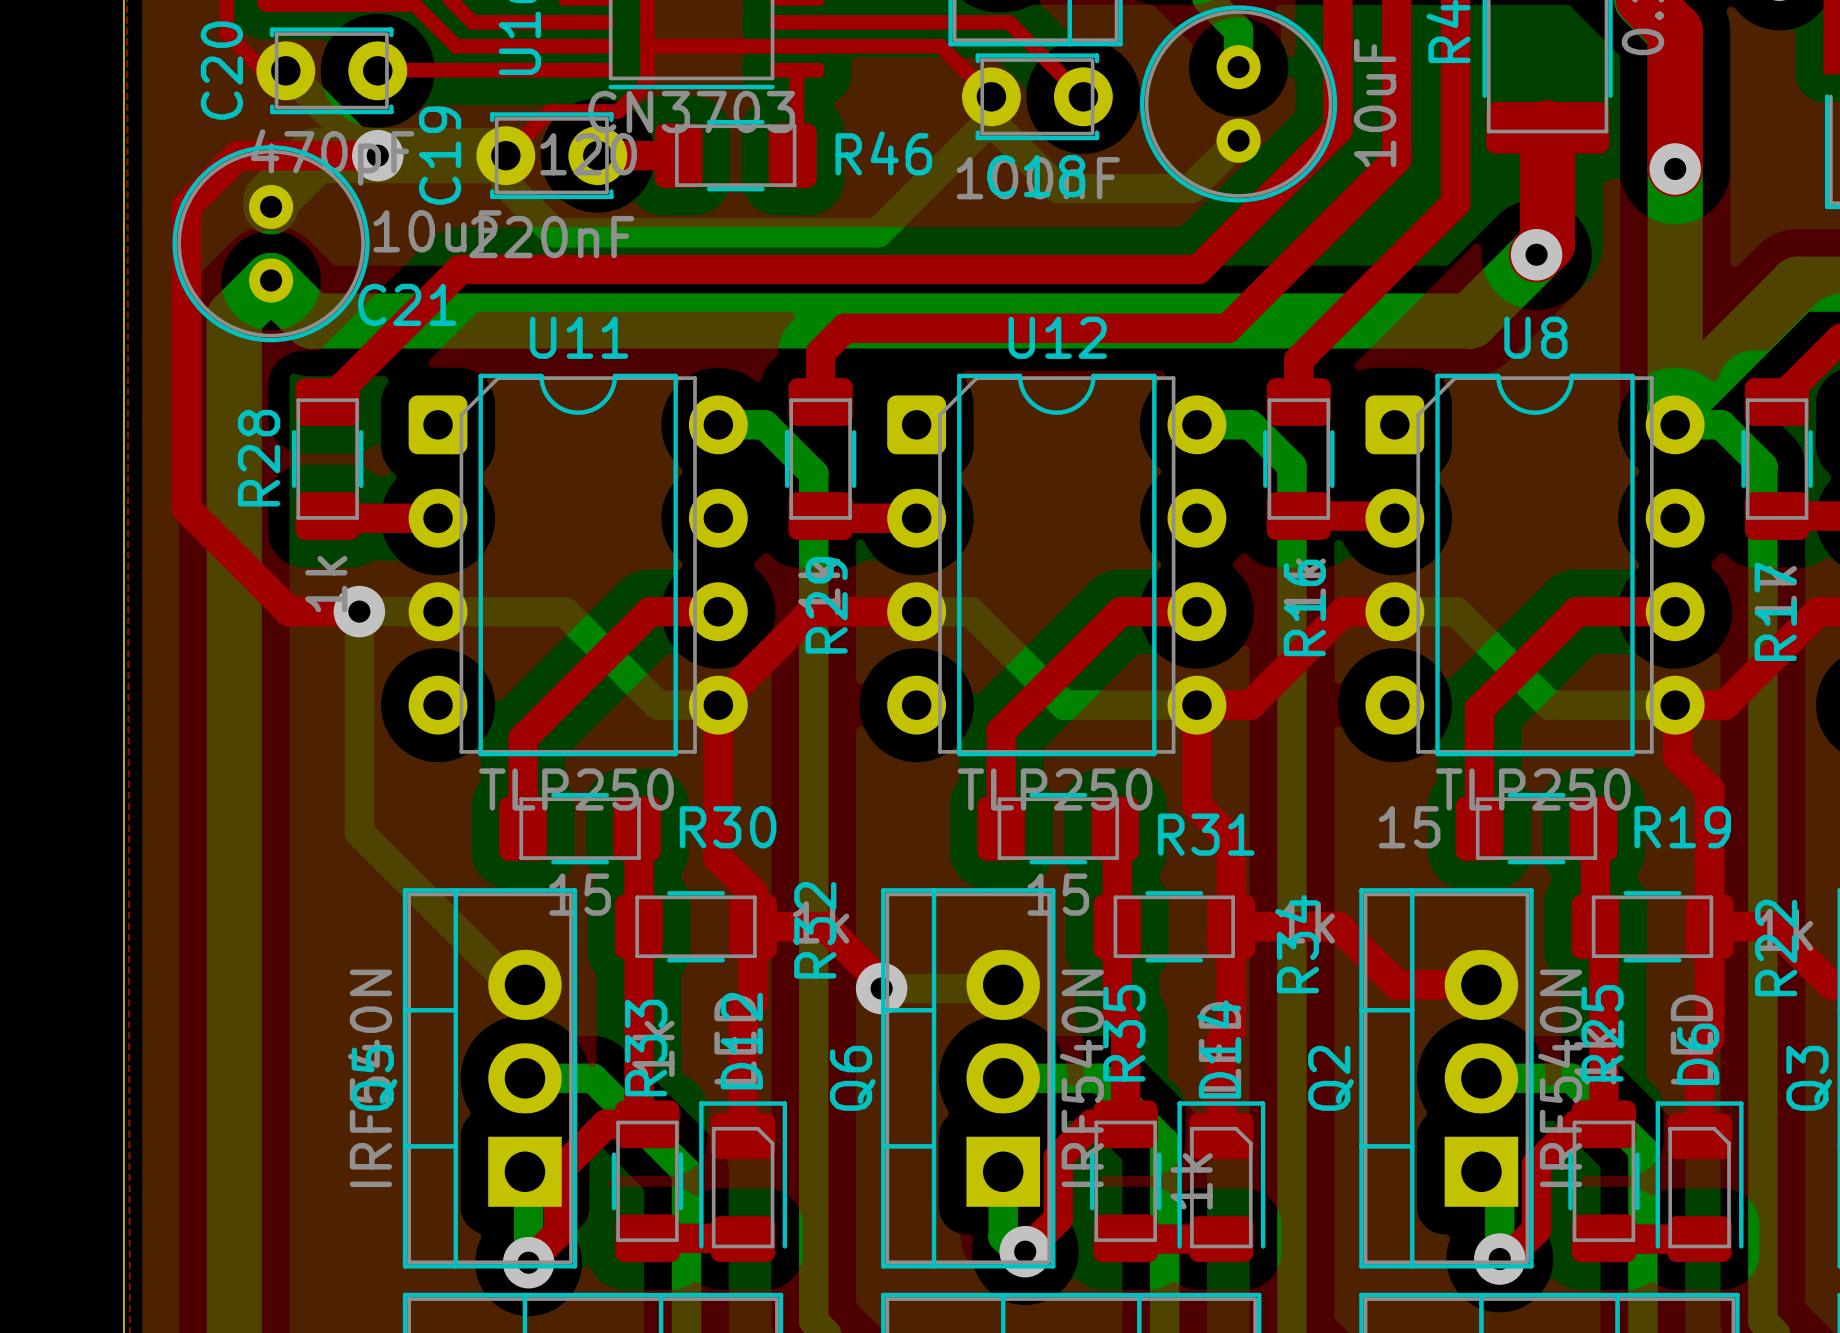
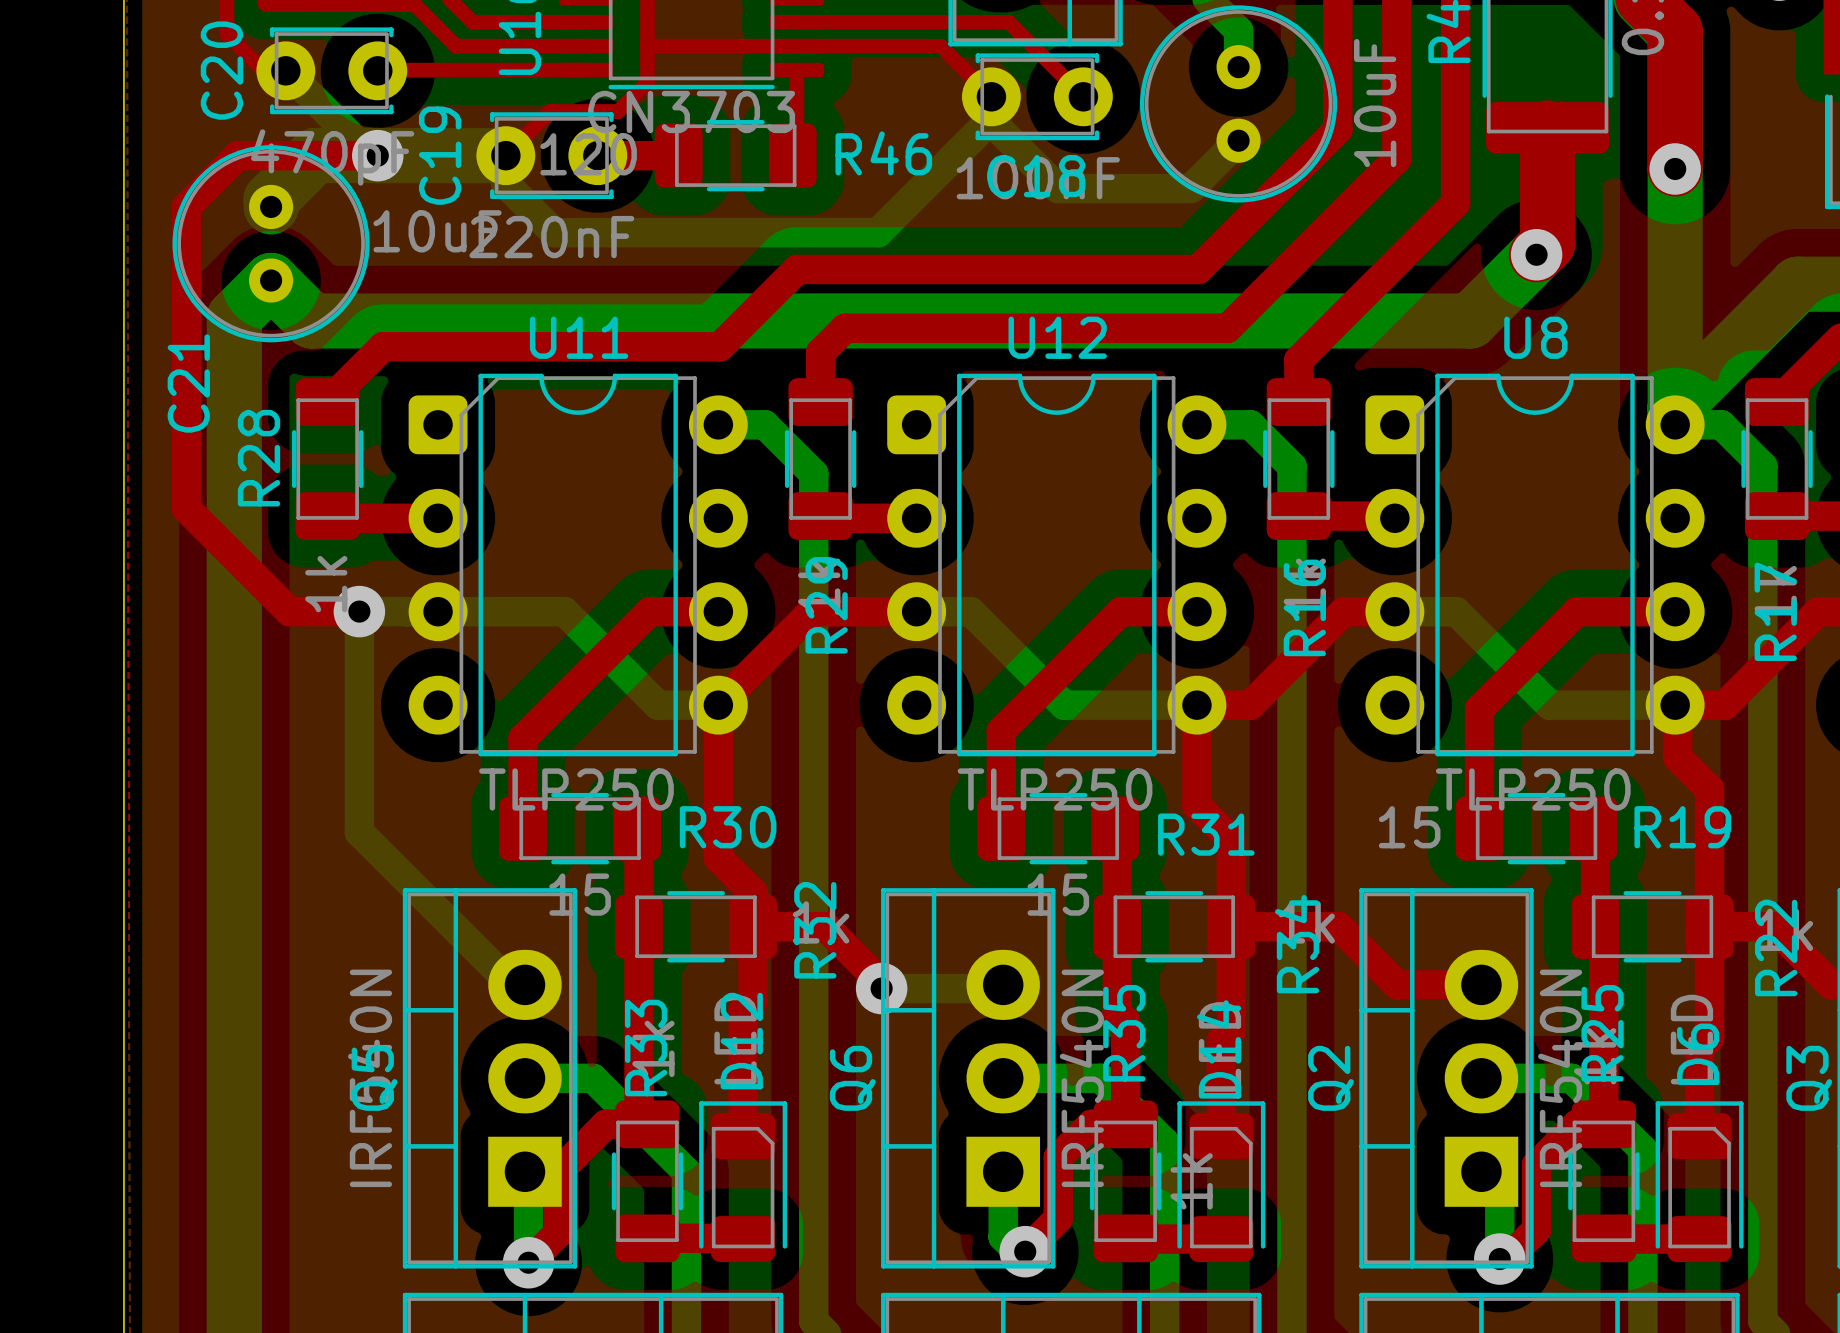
top track: (797, 269) (460, 269) (382, 346) -> (797, 269) (719, 346) (382, 346)
C21 name rotation: 0° (407, 304) -> 90° counterclockwise (188, 383)
C21 name position: C21 (407, 304) -> C21 (188, 383)

